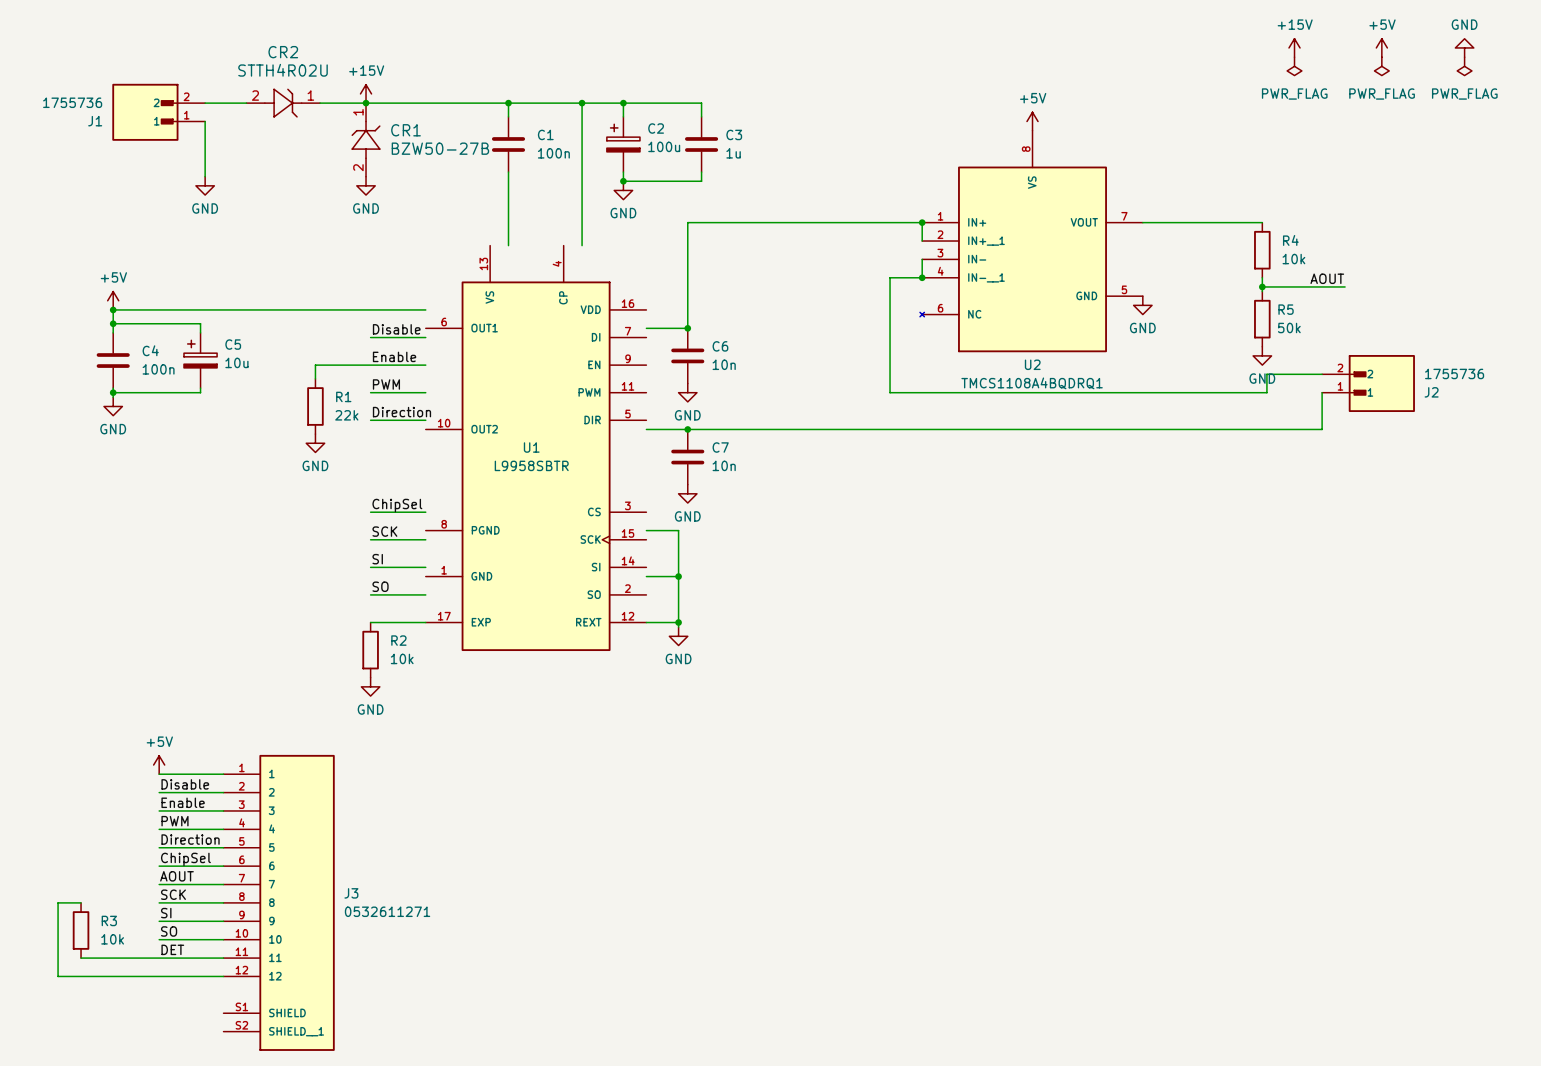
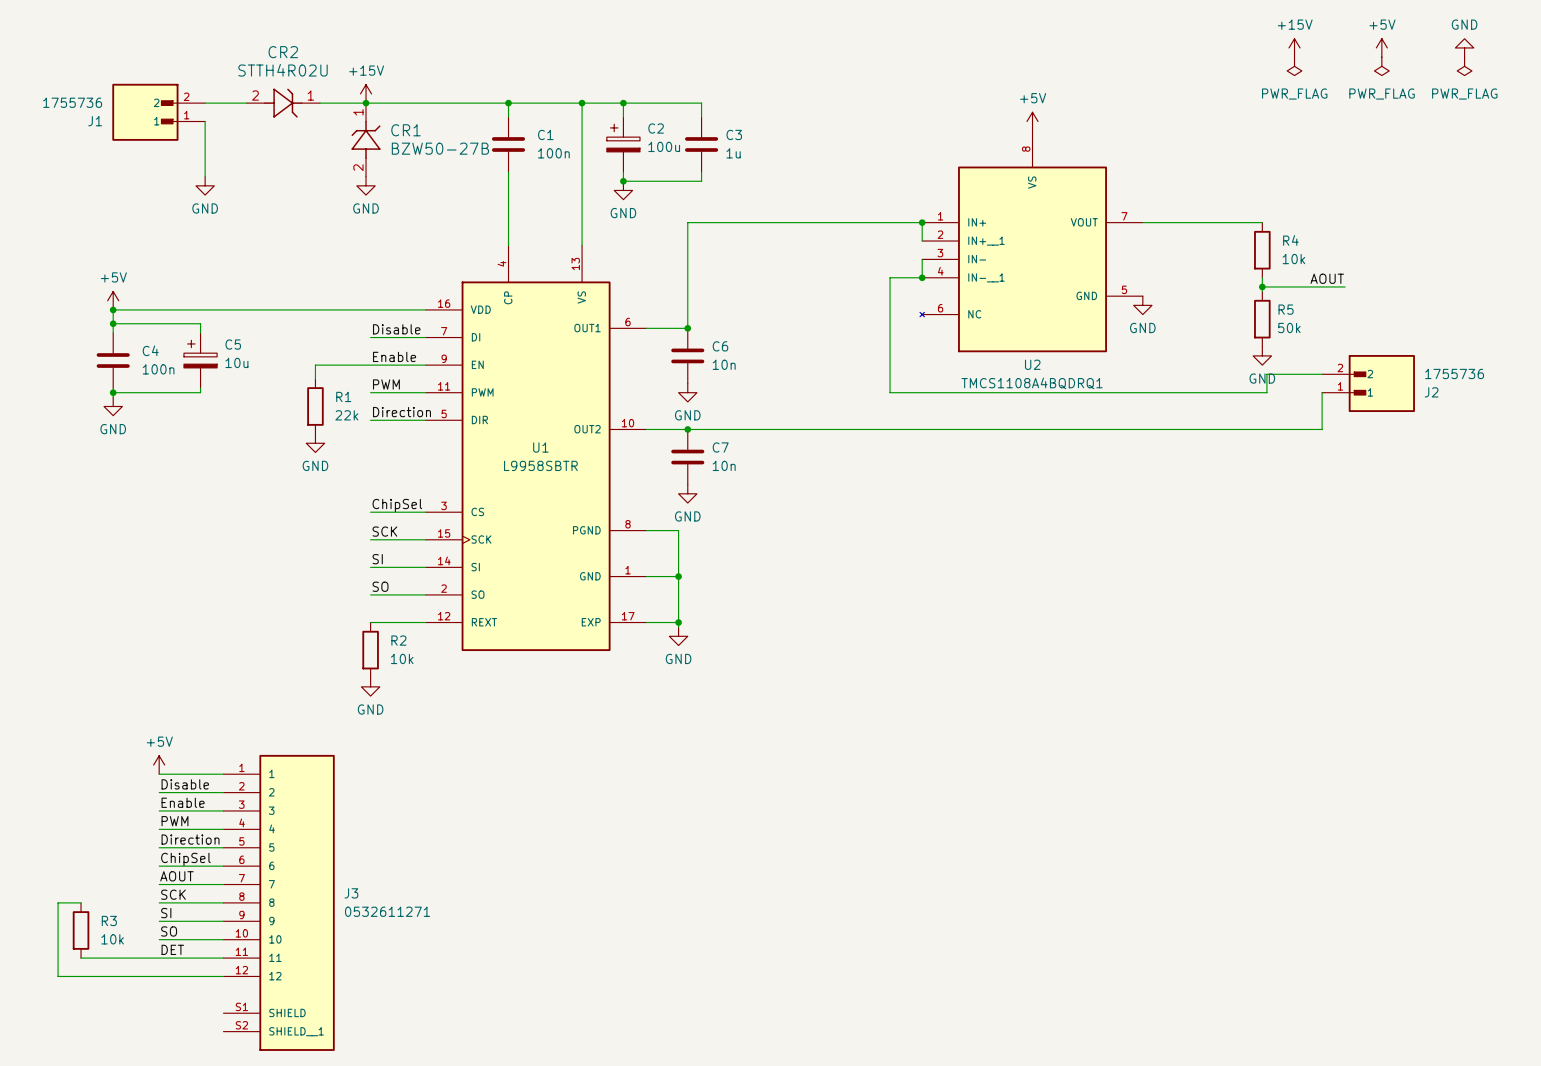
U1 flip: as is (536, 466) -> left-right (536, 466)

